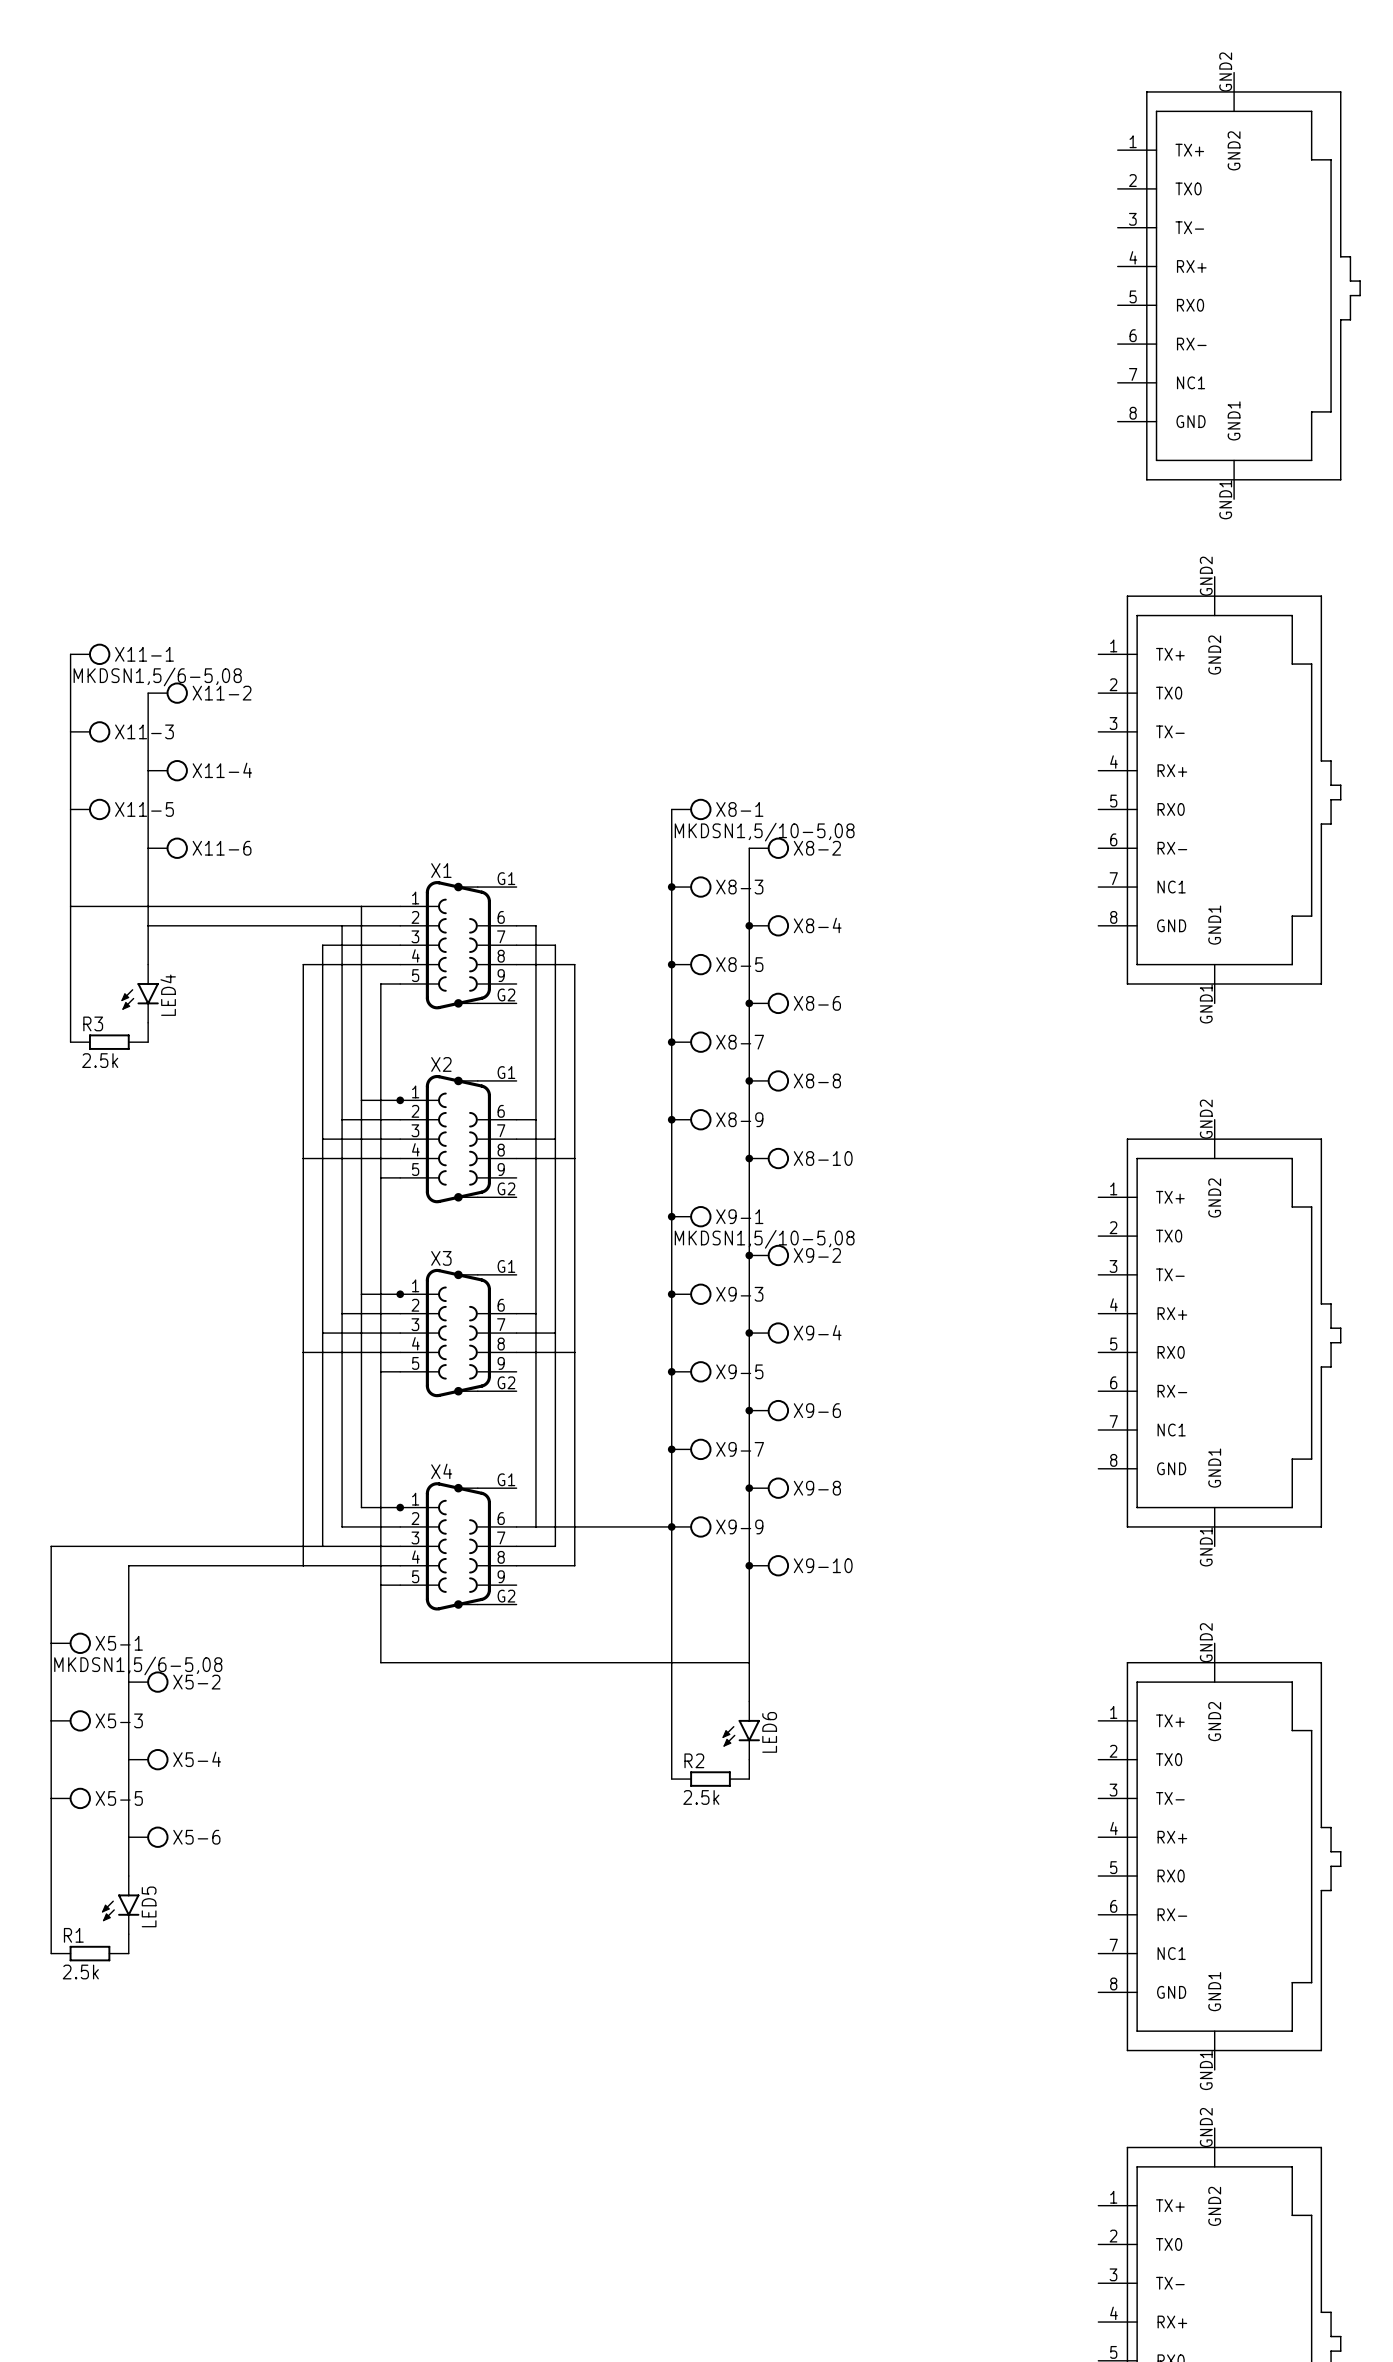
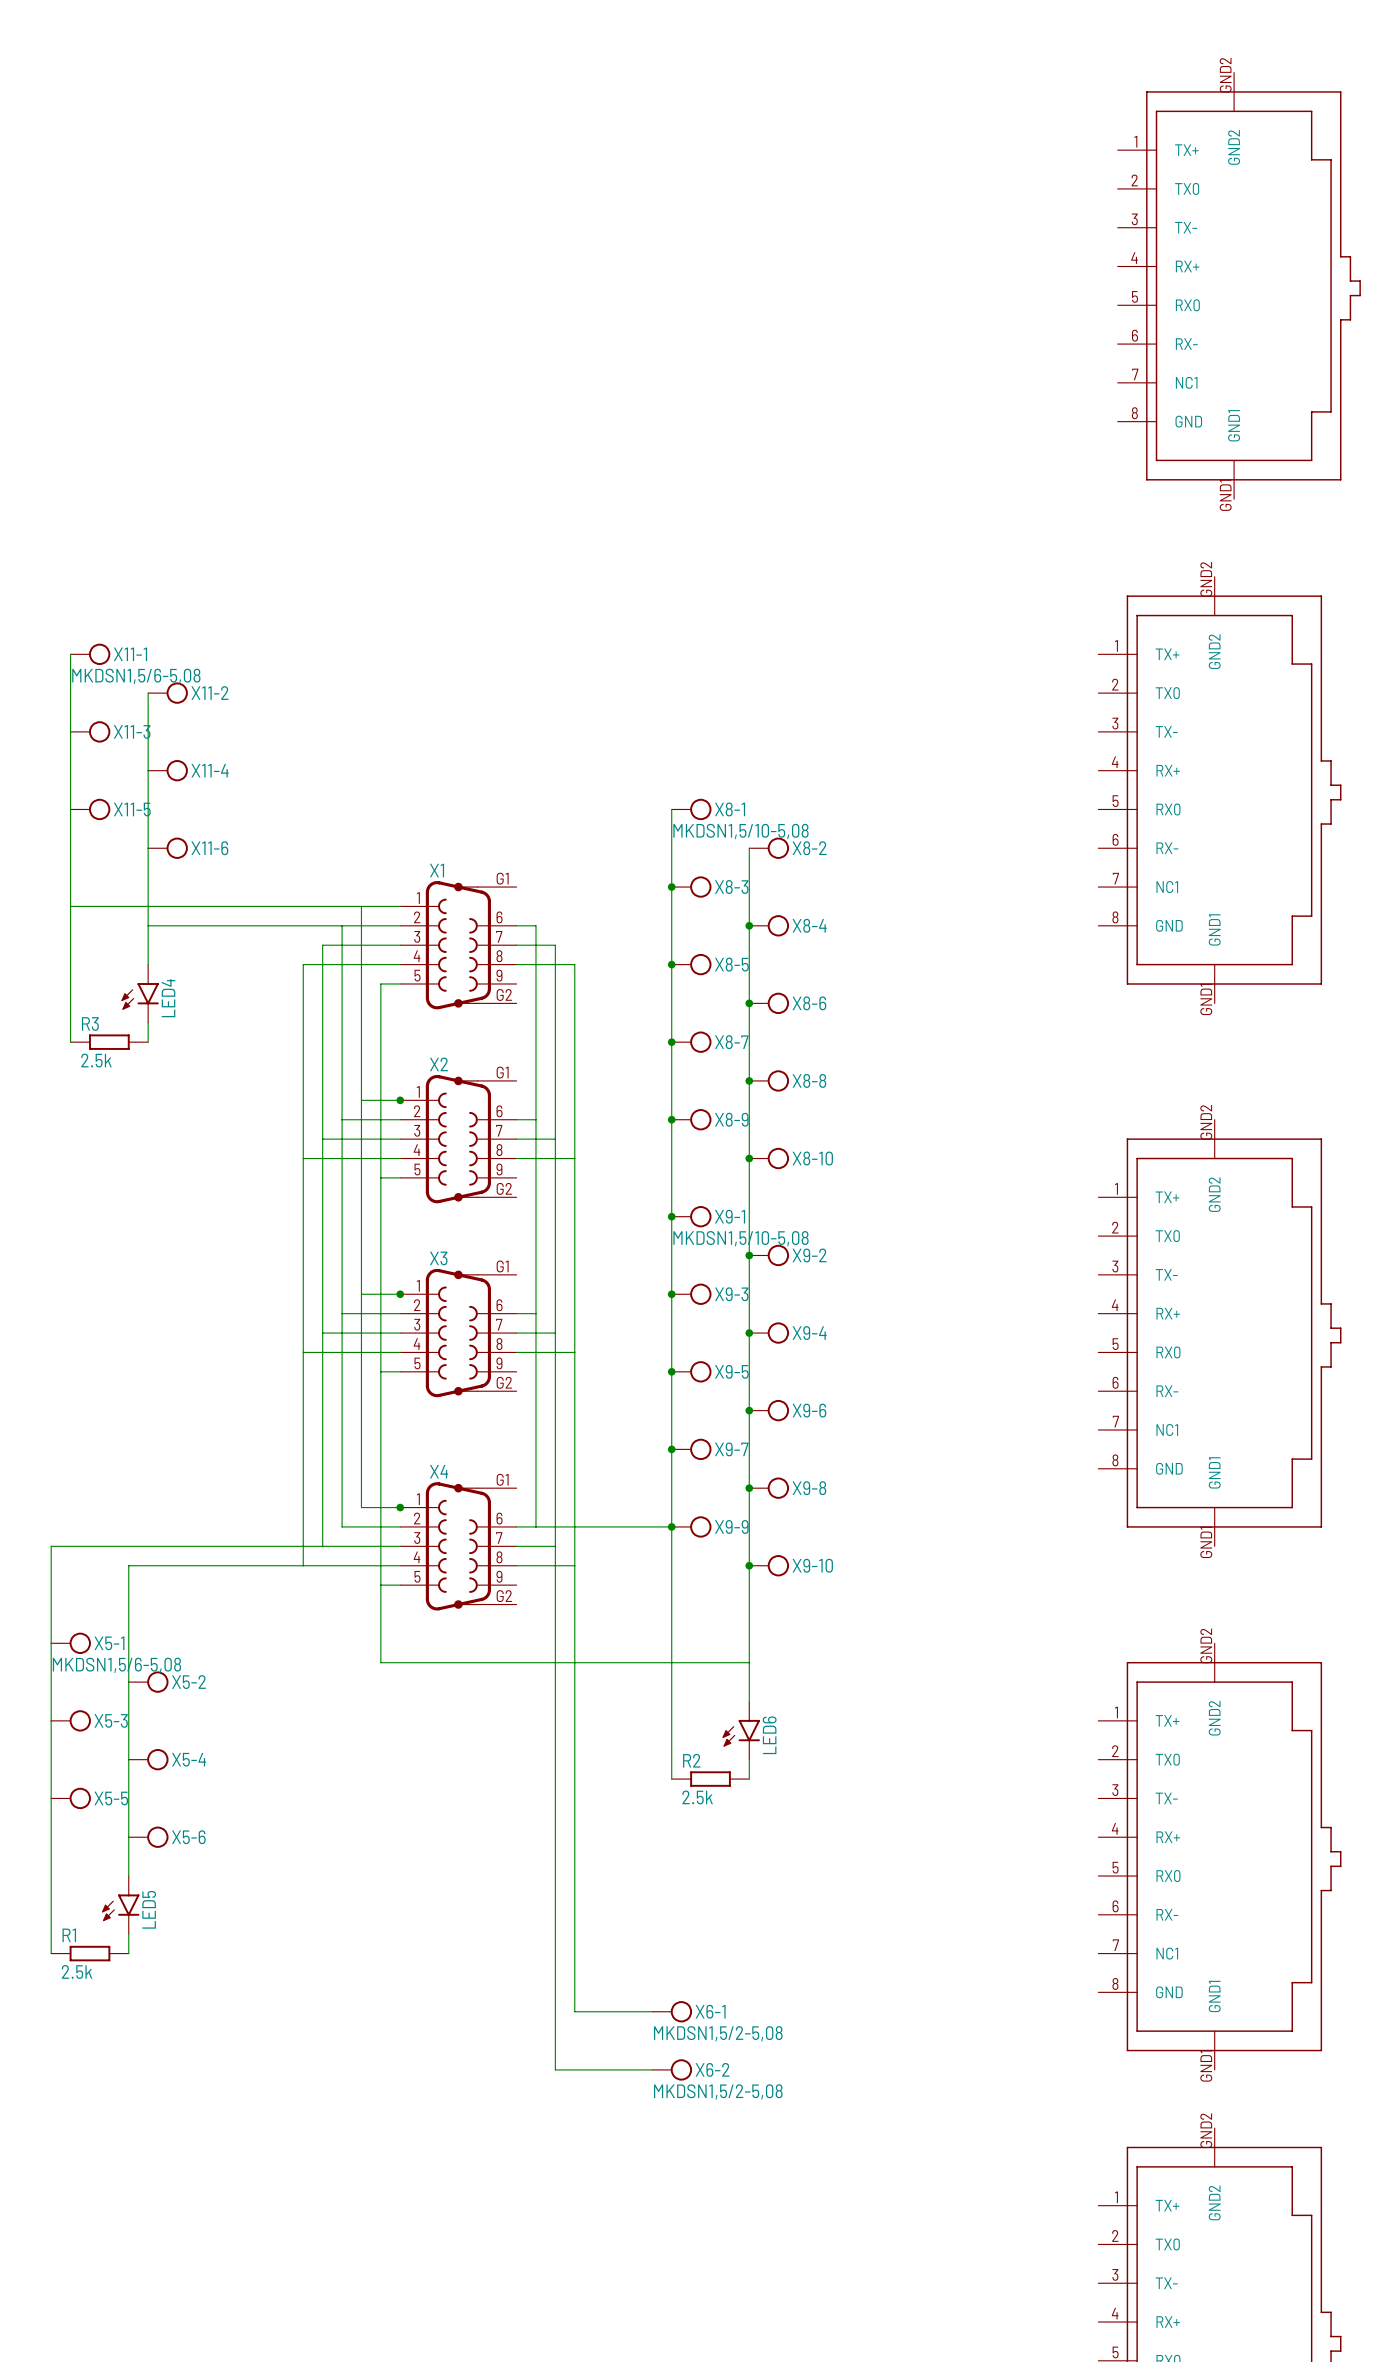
wire: none -> (555, 1546) (555, 2069) (652, 2069)
wire: none -> (574, 1565) (574, 2011) (652, 2011)
X6-1: none -> MKDSN1,5/2-5,08 (672, 2011)
X6-2: none -> MKDSN1,5/2-5,08 (672, 2069)

